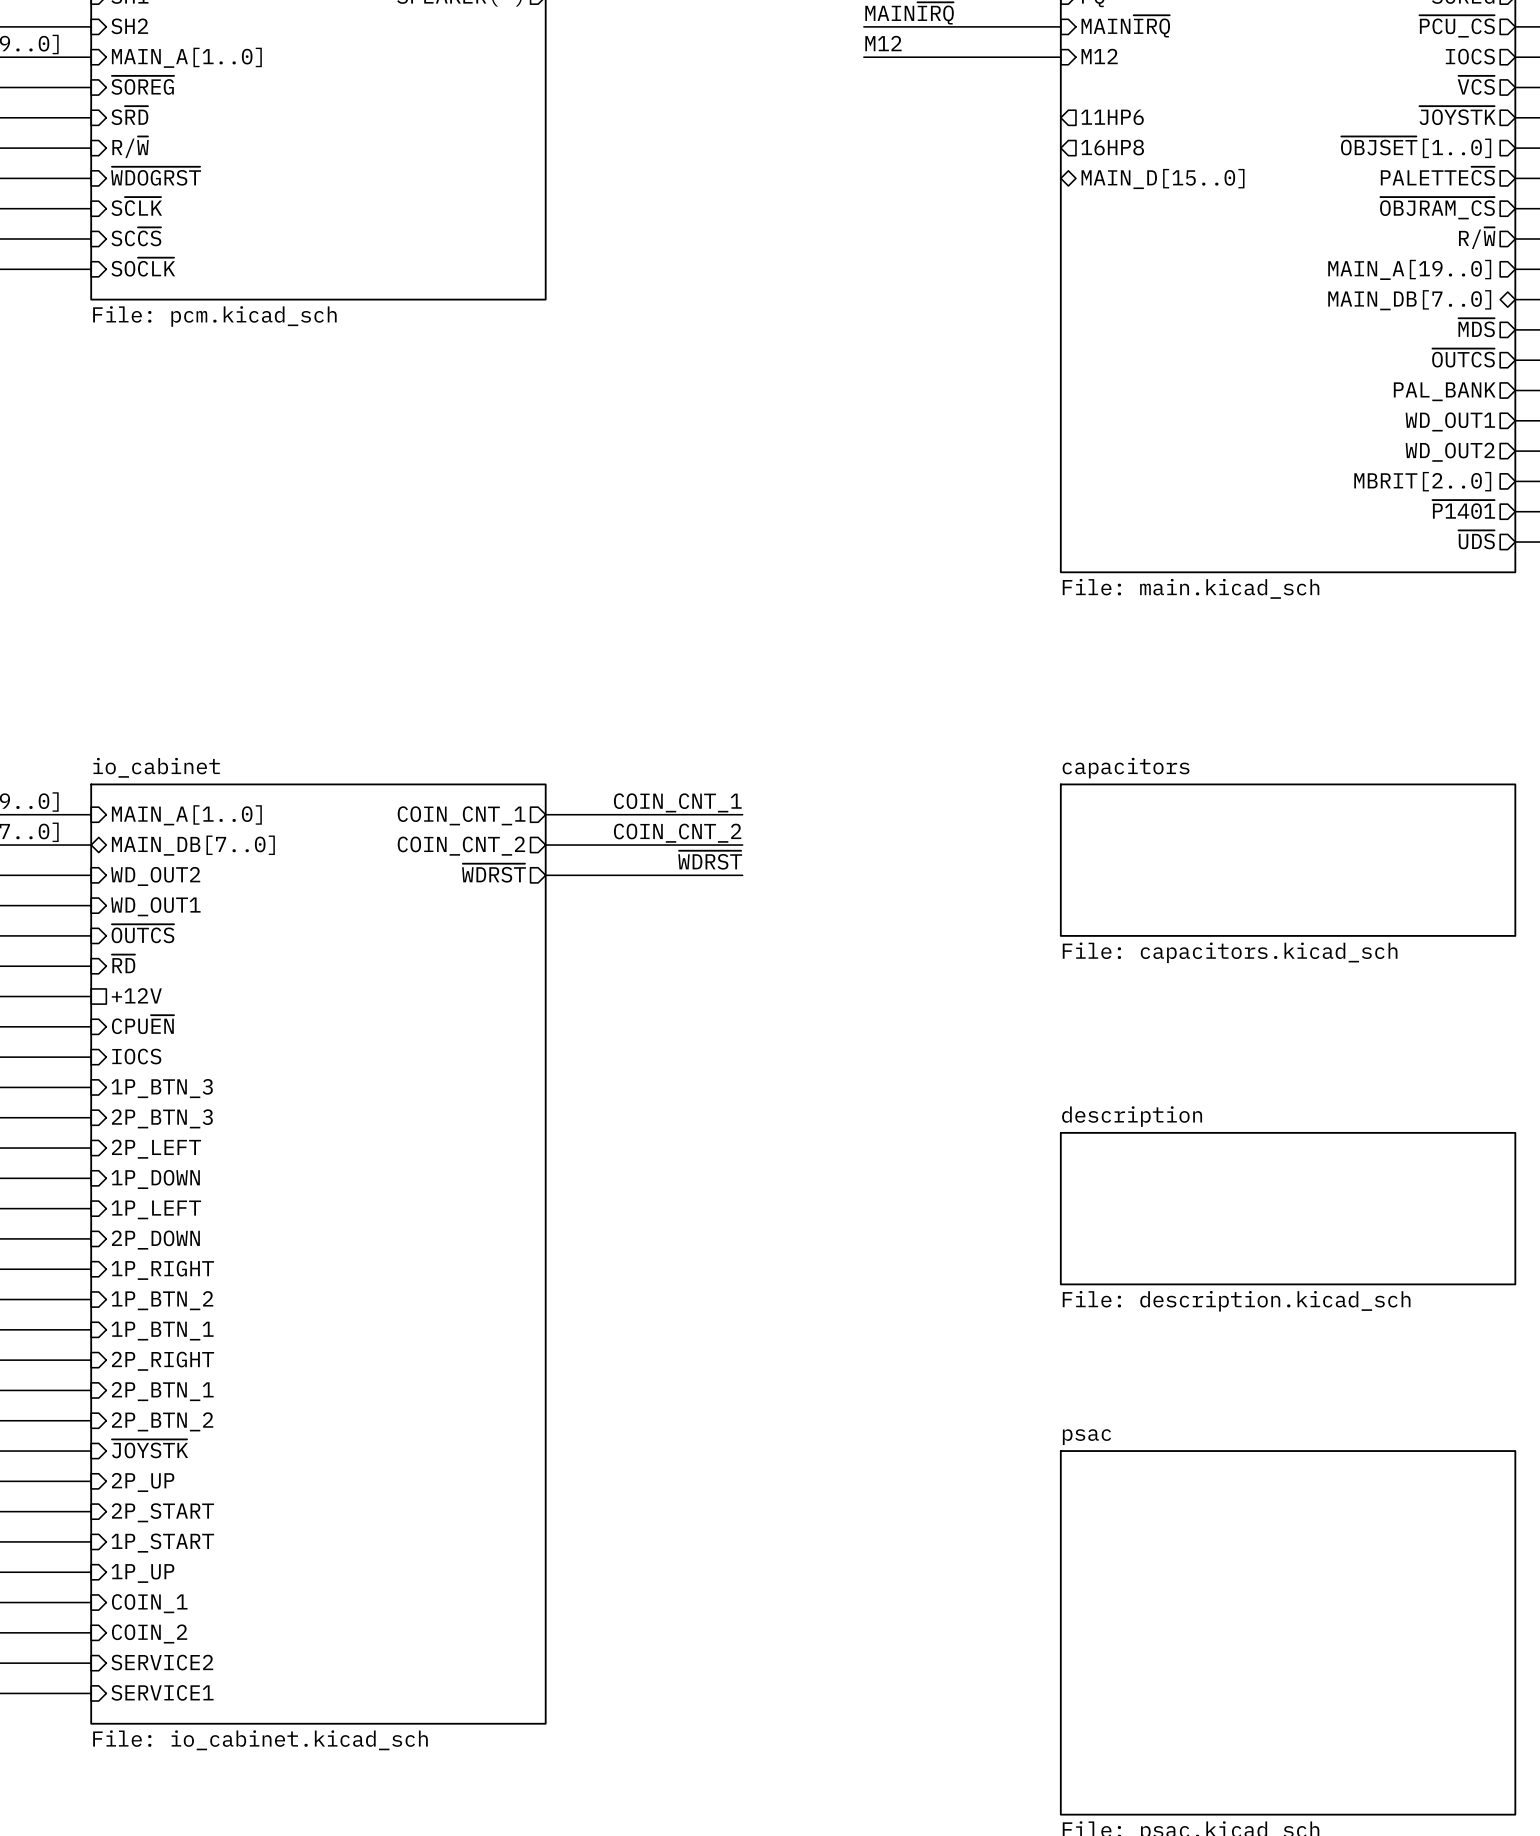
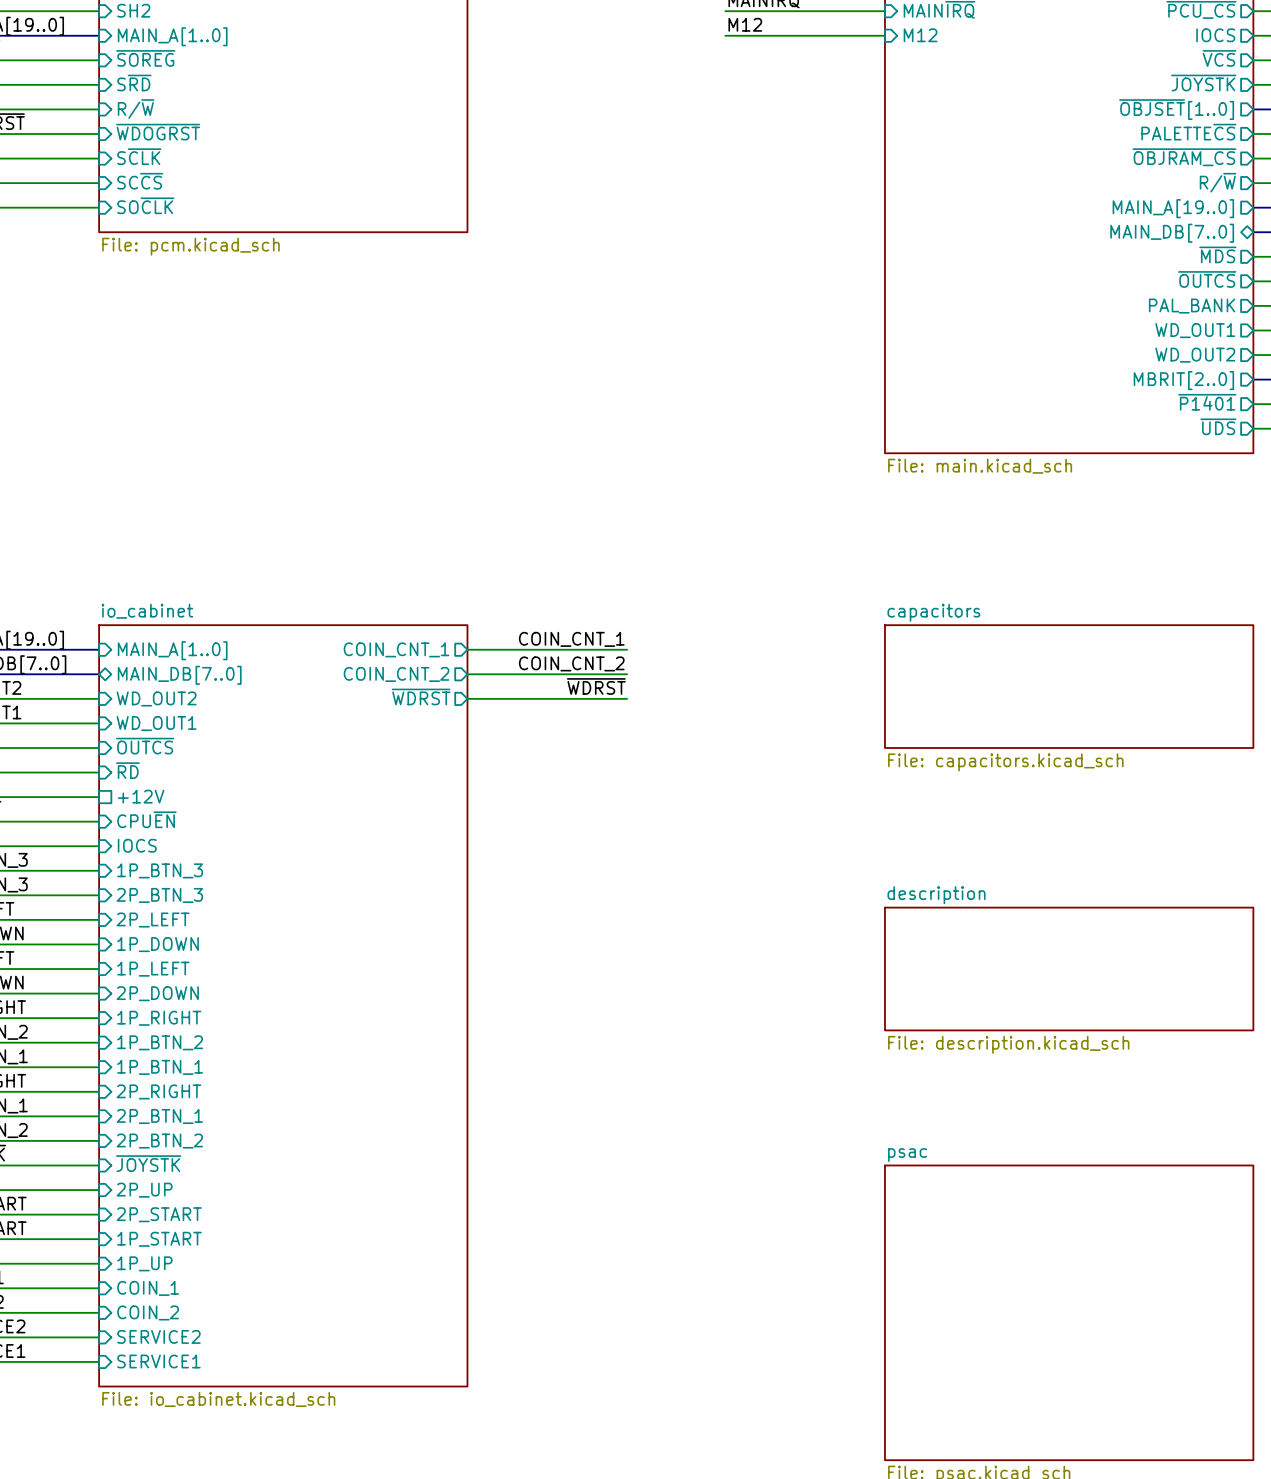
sheet pin: 11HP6 (1112, 117) -> none
sheet pin: 16HP8 (1112, 147) -> none
sheet pin: MAIN_D[15..0] (1163, 178) -> none

